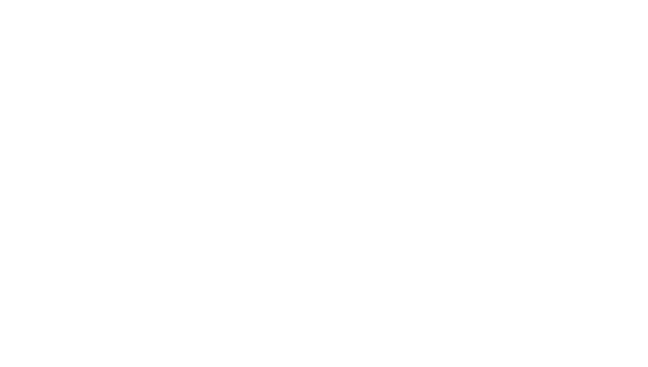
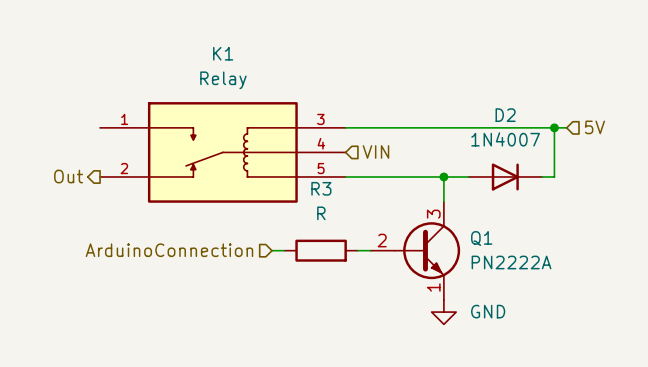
wire: none -> (345, 127) (566, 127)
wire: none -> (554, 127) (554, 176) (542, 176)
junction: none -> (554, 127)
hierarchical label: none -> 5V (594, 127)
K1: none -> Relay (222, 152)
hierarchical label: none -> VIN (375, 151)
hierarchical label: none -> Out (68, 176)
wire: none -> (345, 176) (468, 176)
wire: none -> (443, 176) (443, 201)
junction: none -> (443, 176)
D2: none -> 1N4007 (505, 176)
hierarchical label: none -> ArduinoConnection (169, 250)
wire: none -> (271, 250) (284, 250)
R3: none -> R (321, 250)
wire: none -> (357, 250) (370, 250)
Q1: none -> PN2222A (415, 250)
power symbol: none -> GND (443, 312)

